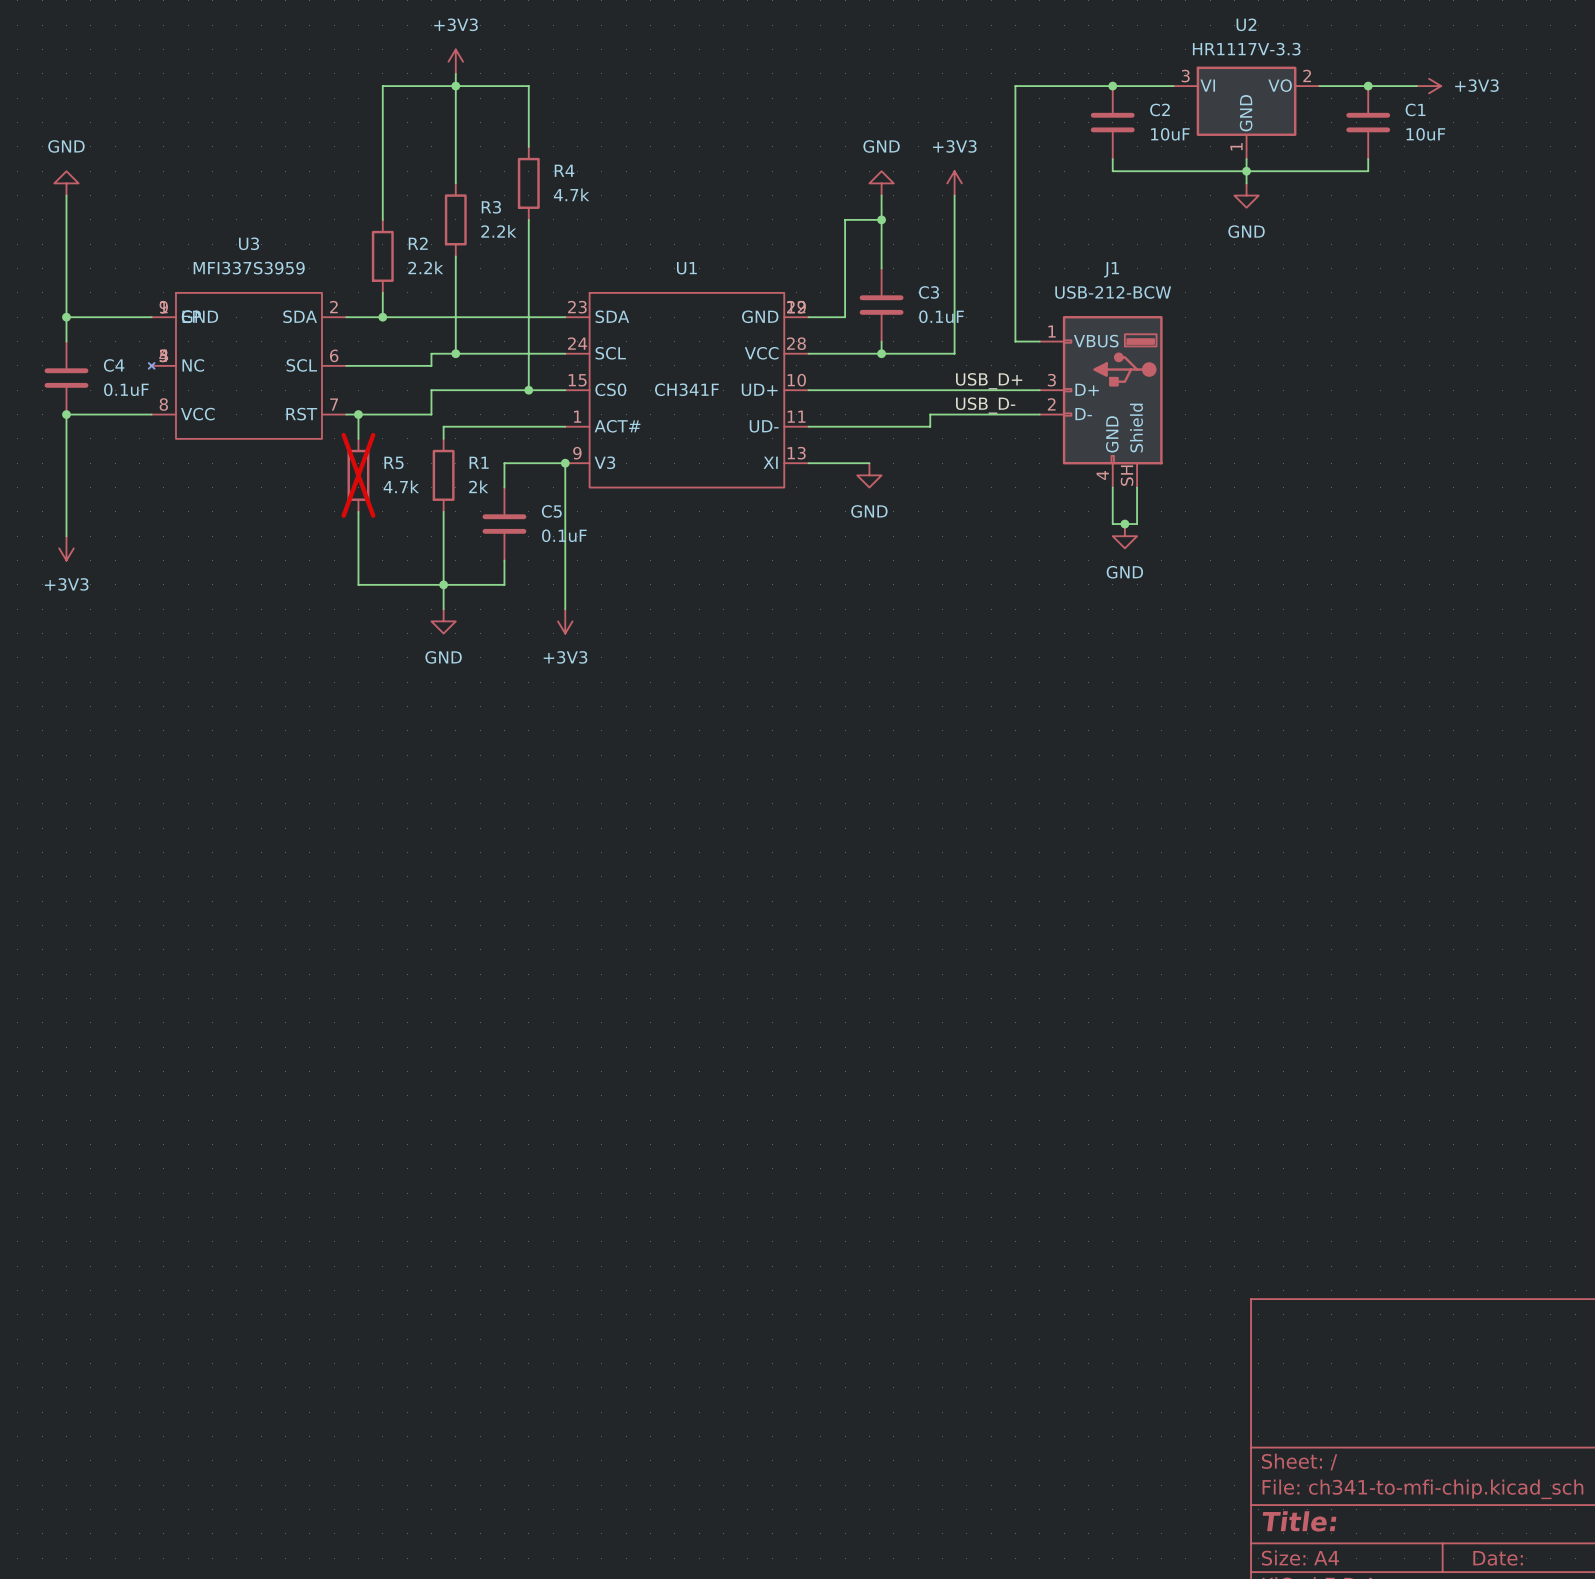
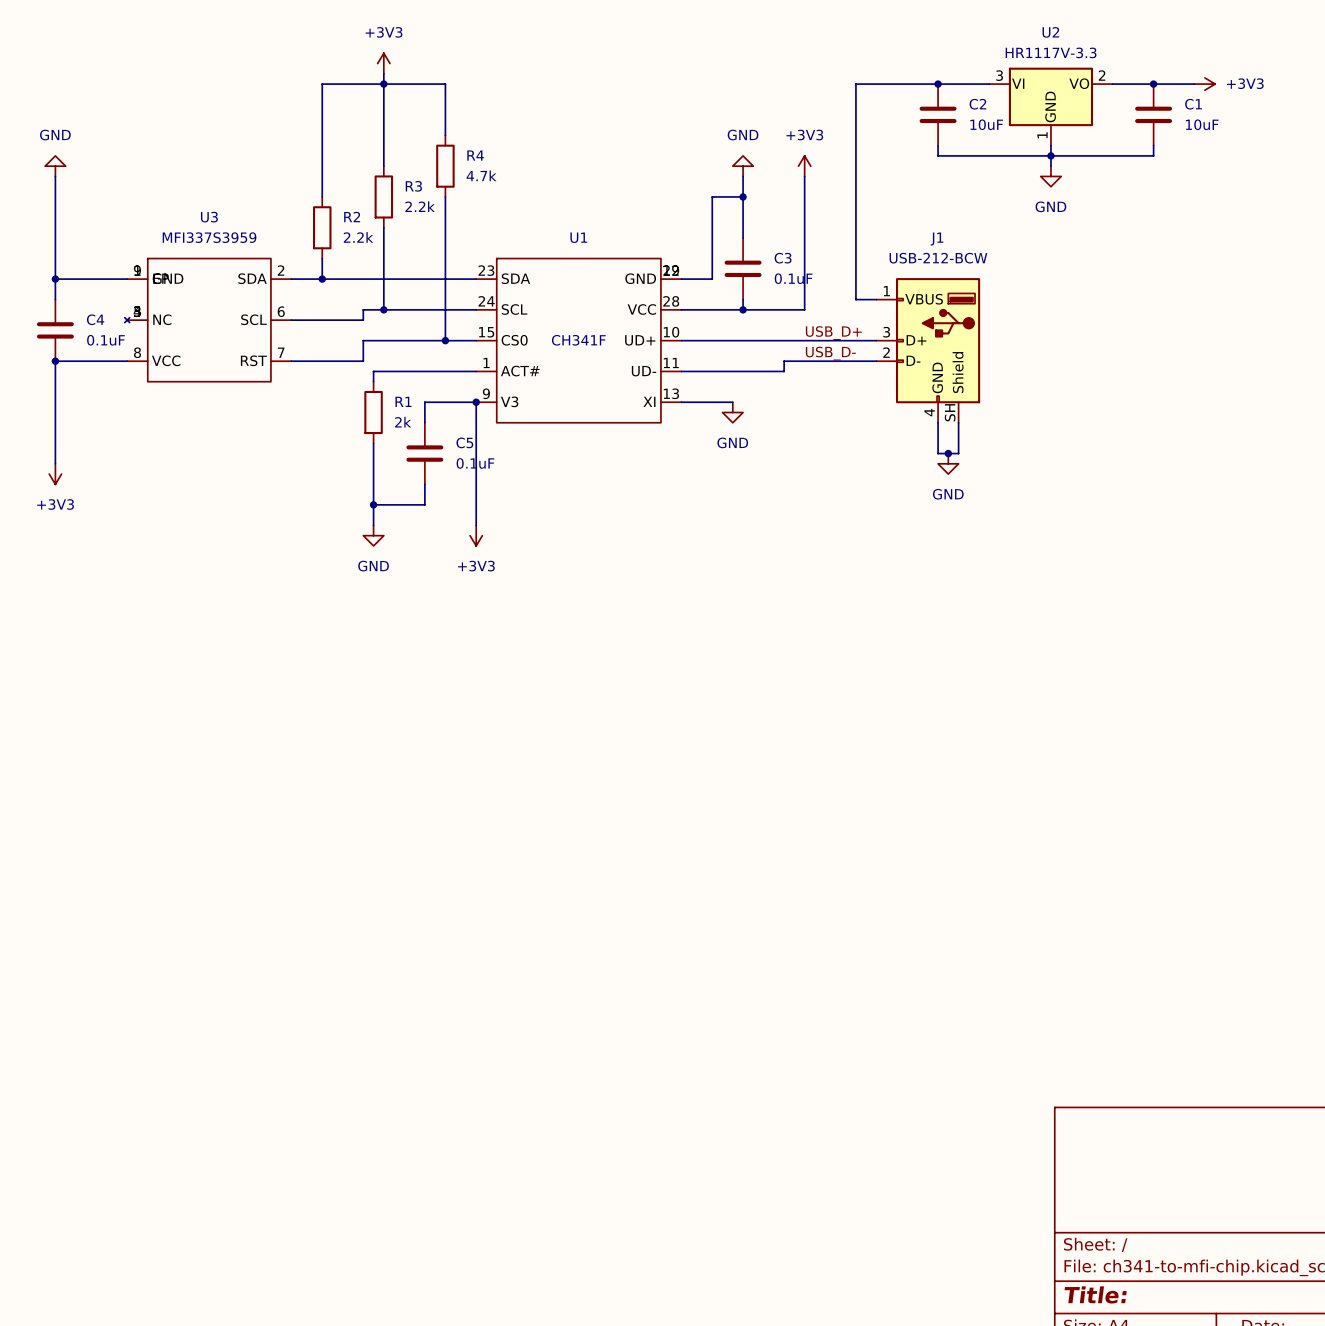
wire: (358, 414) (358, 438) -> none
junction: (358, 414) -> none
R5: 4.7k (358, 475) -> none
wire: (358, 511) (358, 584) (443, 584) -> none

